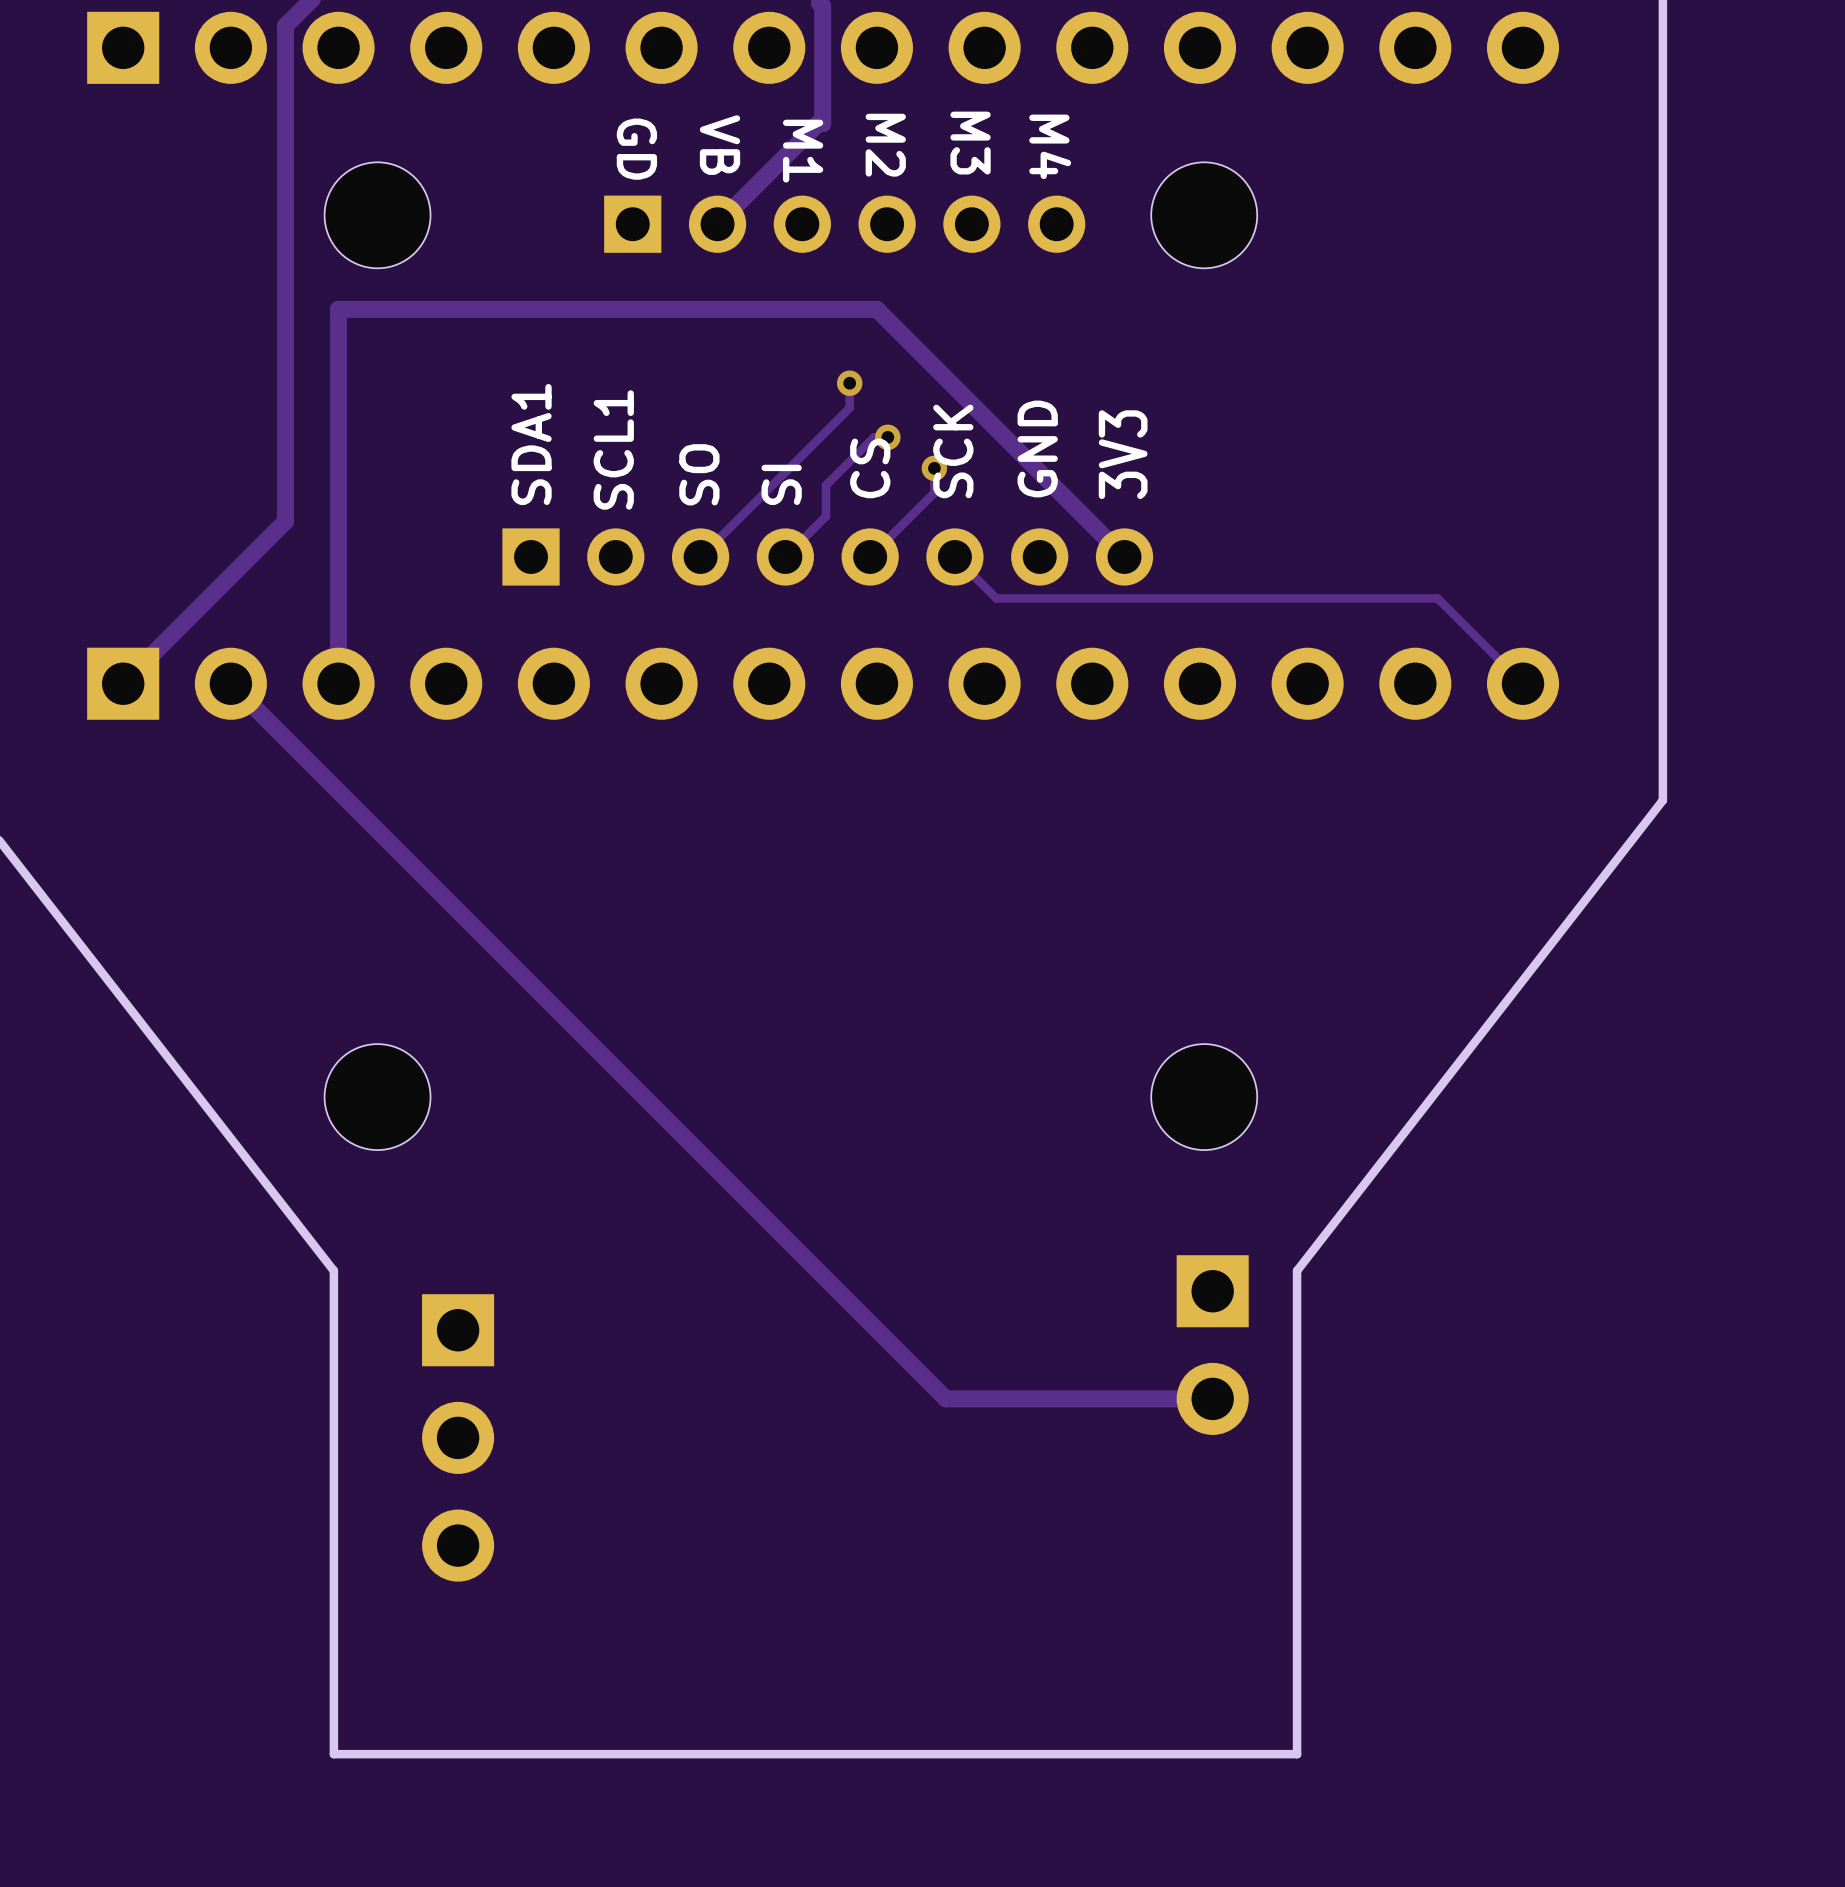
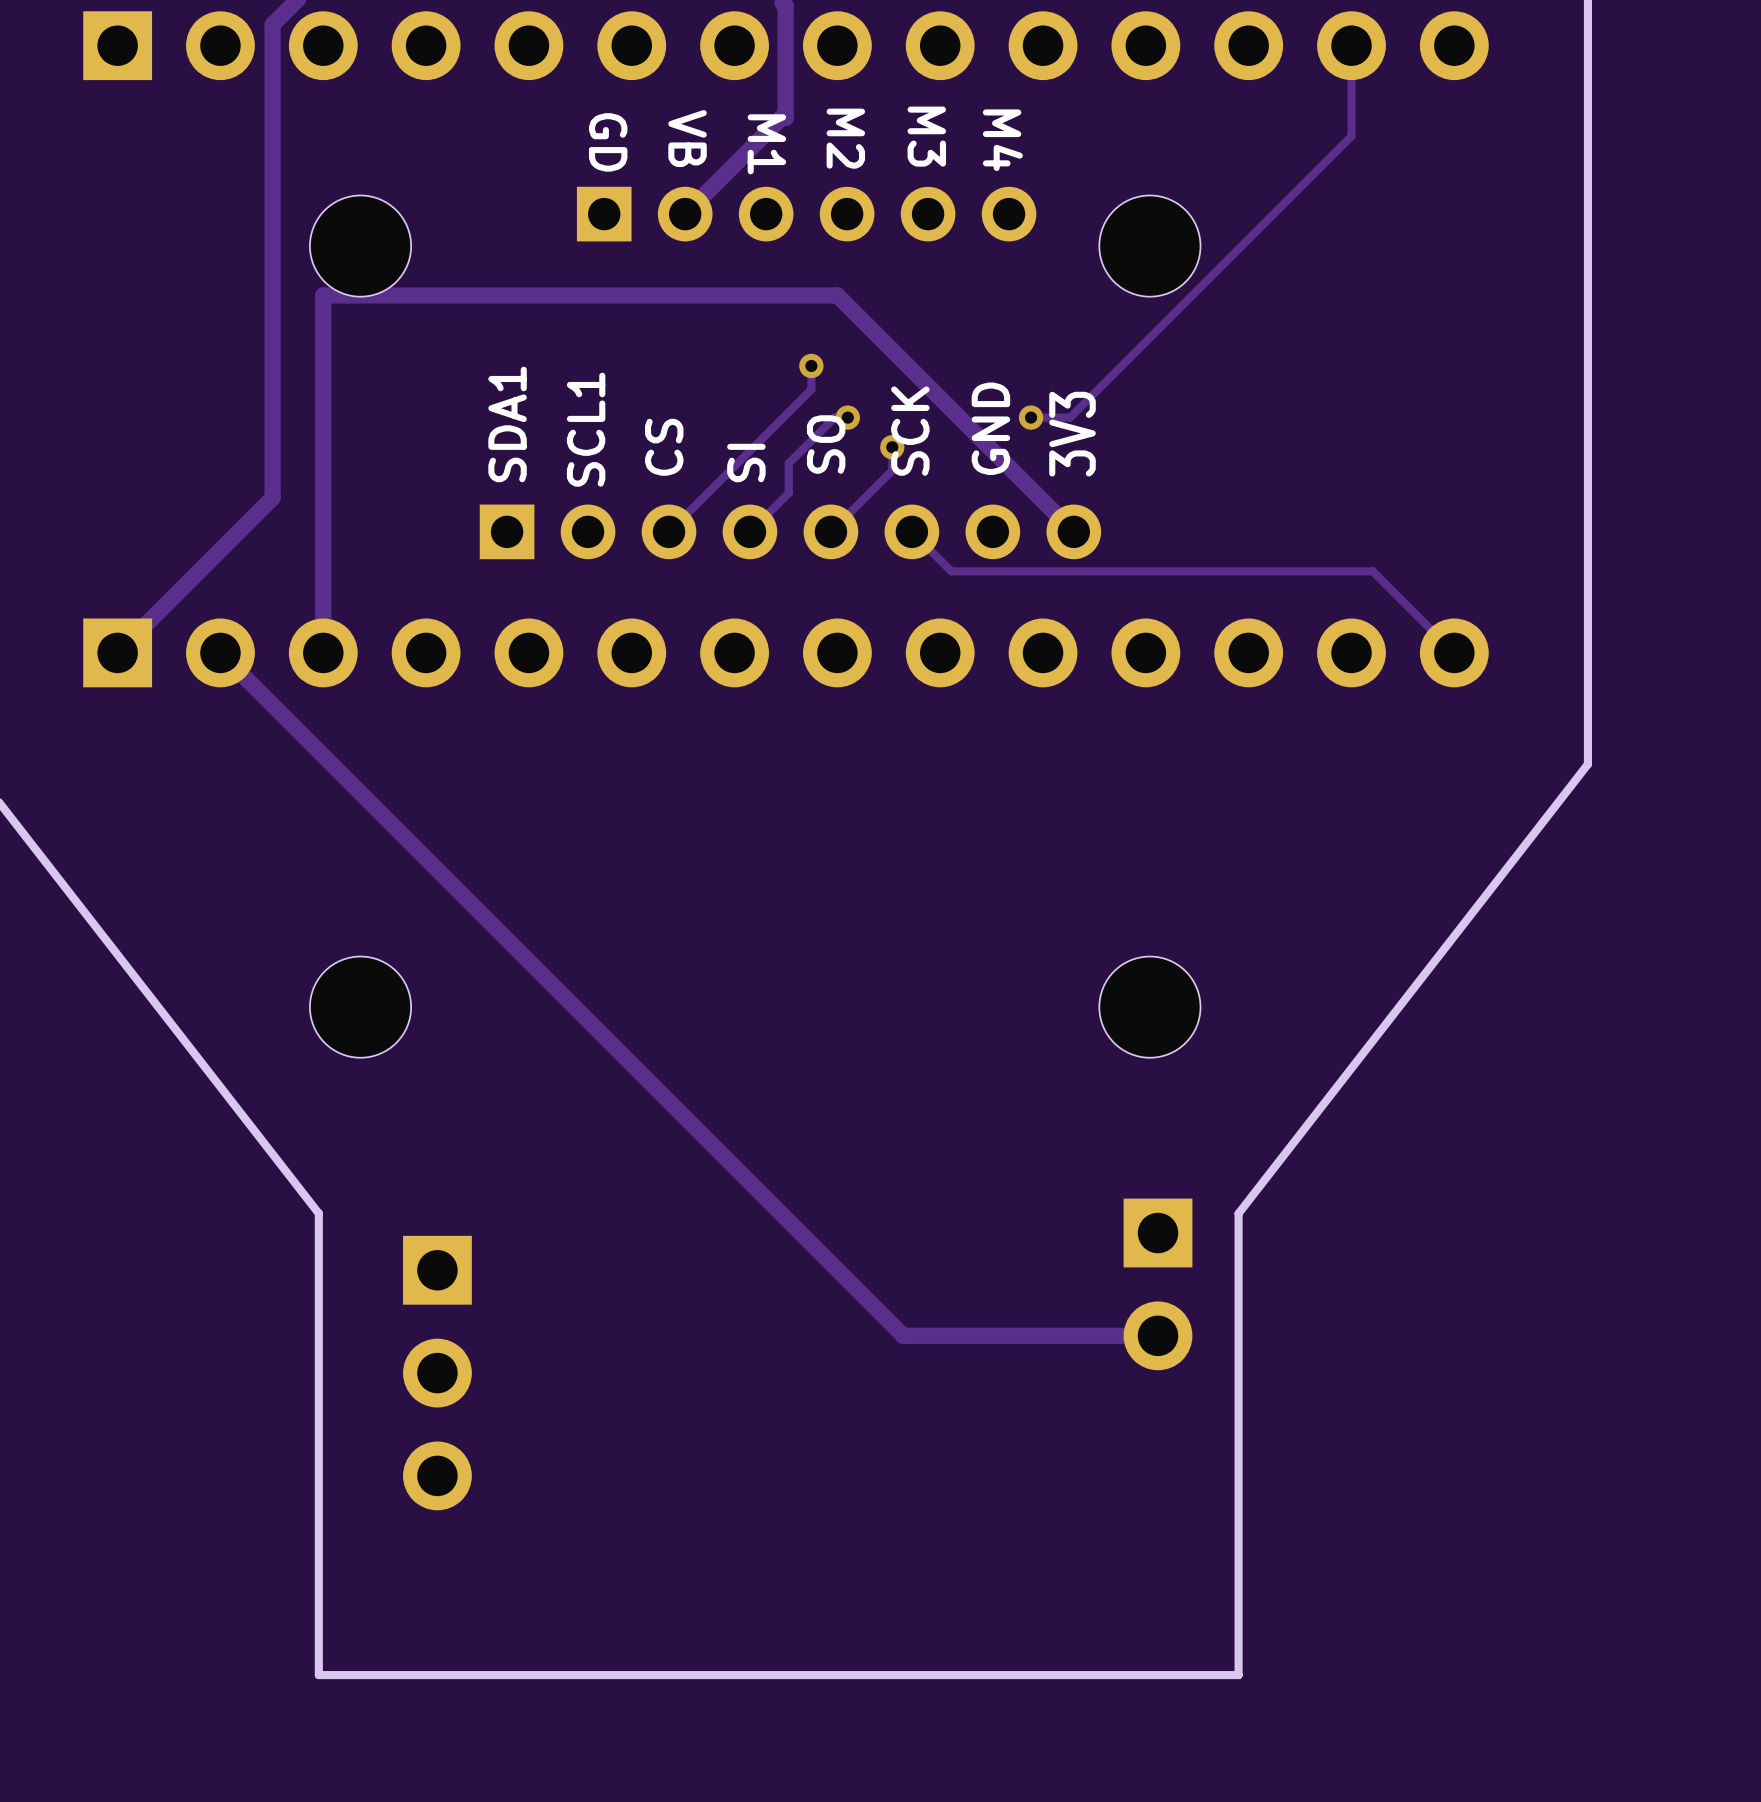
track: none -> (1351, 45) (1351, 136) (1070, 417) (1031, 417)
part position: (377, 215) -> (360, 246)
part position: (1204, 215) -> (1149, 246)
via: none -> (1031, 417)
text: CS (870, 468) -> SO (826, 444)
text: SO (699, 474) -> CS (664, 447)
part position: (377, 1097) -> (360, 1007)
part position: (1204, 1097) -> (1149, 1007)

